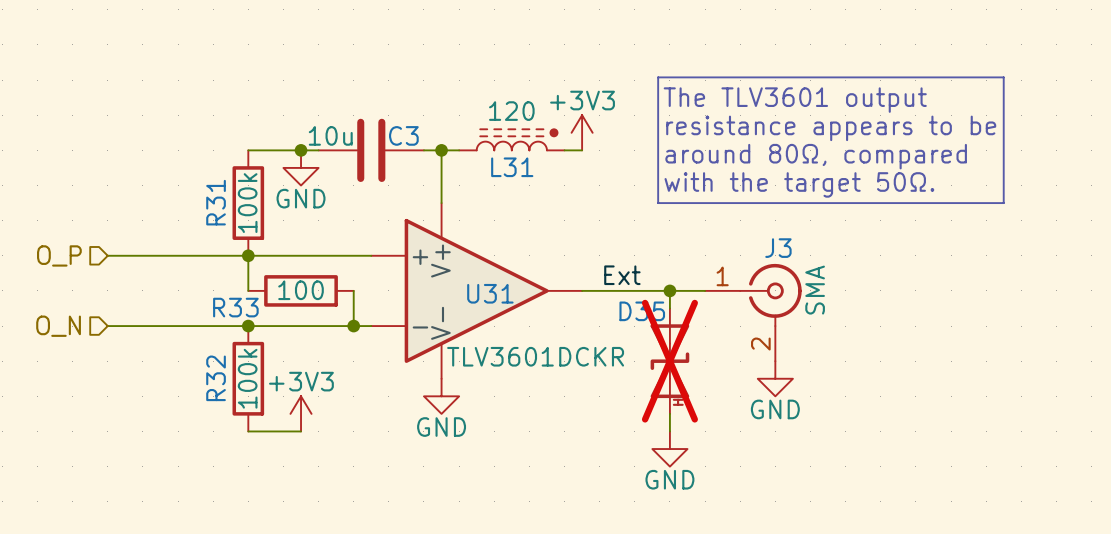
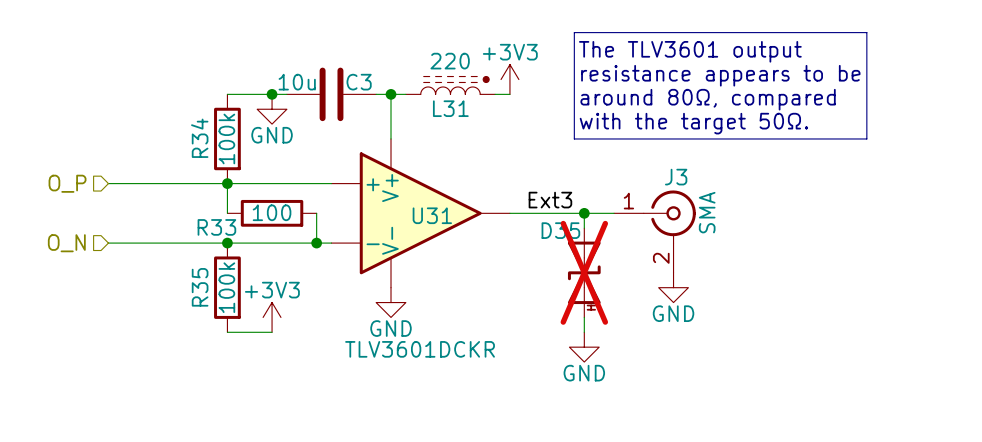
L31 value: 120 (511, 111) -> 220 (450, 61)
R31 name: R31 (216, 202) -> R34 (199, 138)
label: Ext (622, 275) -> Ext3 (550, 200)
U31 value position: TLV3601DCKR (535, 356) -> TLV3601DCKR (420, 349)
R32 name: R32 (216, 378) -> R35 (200, 287)

